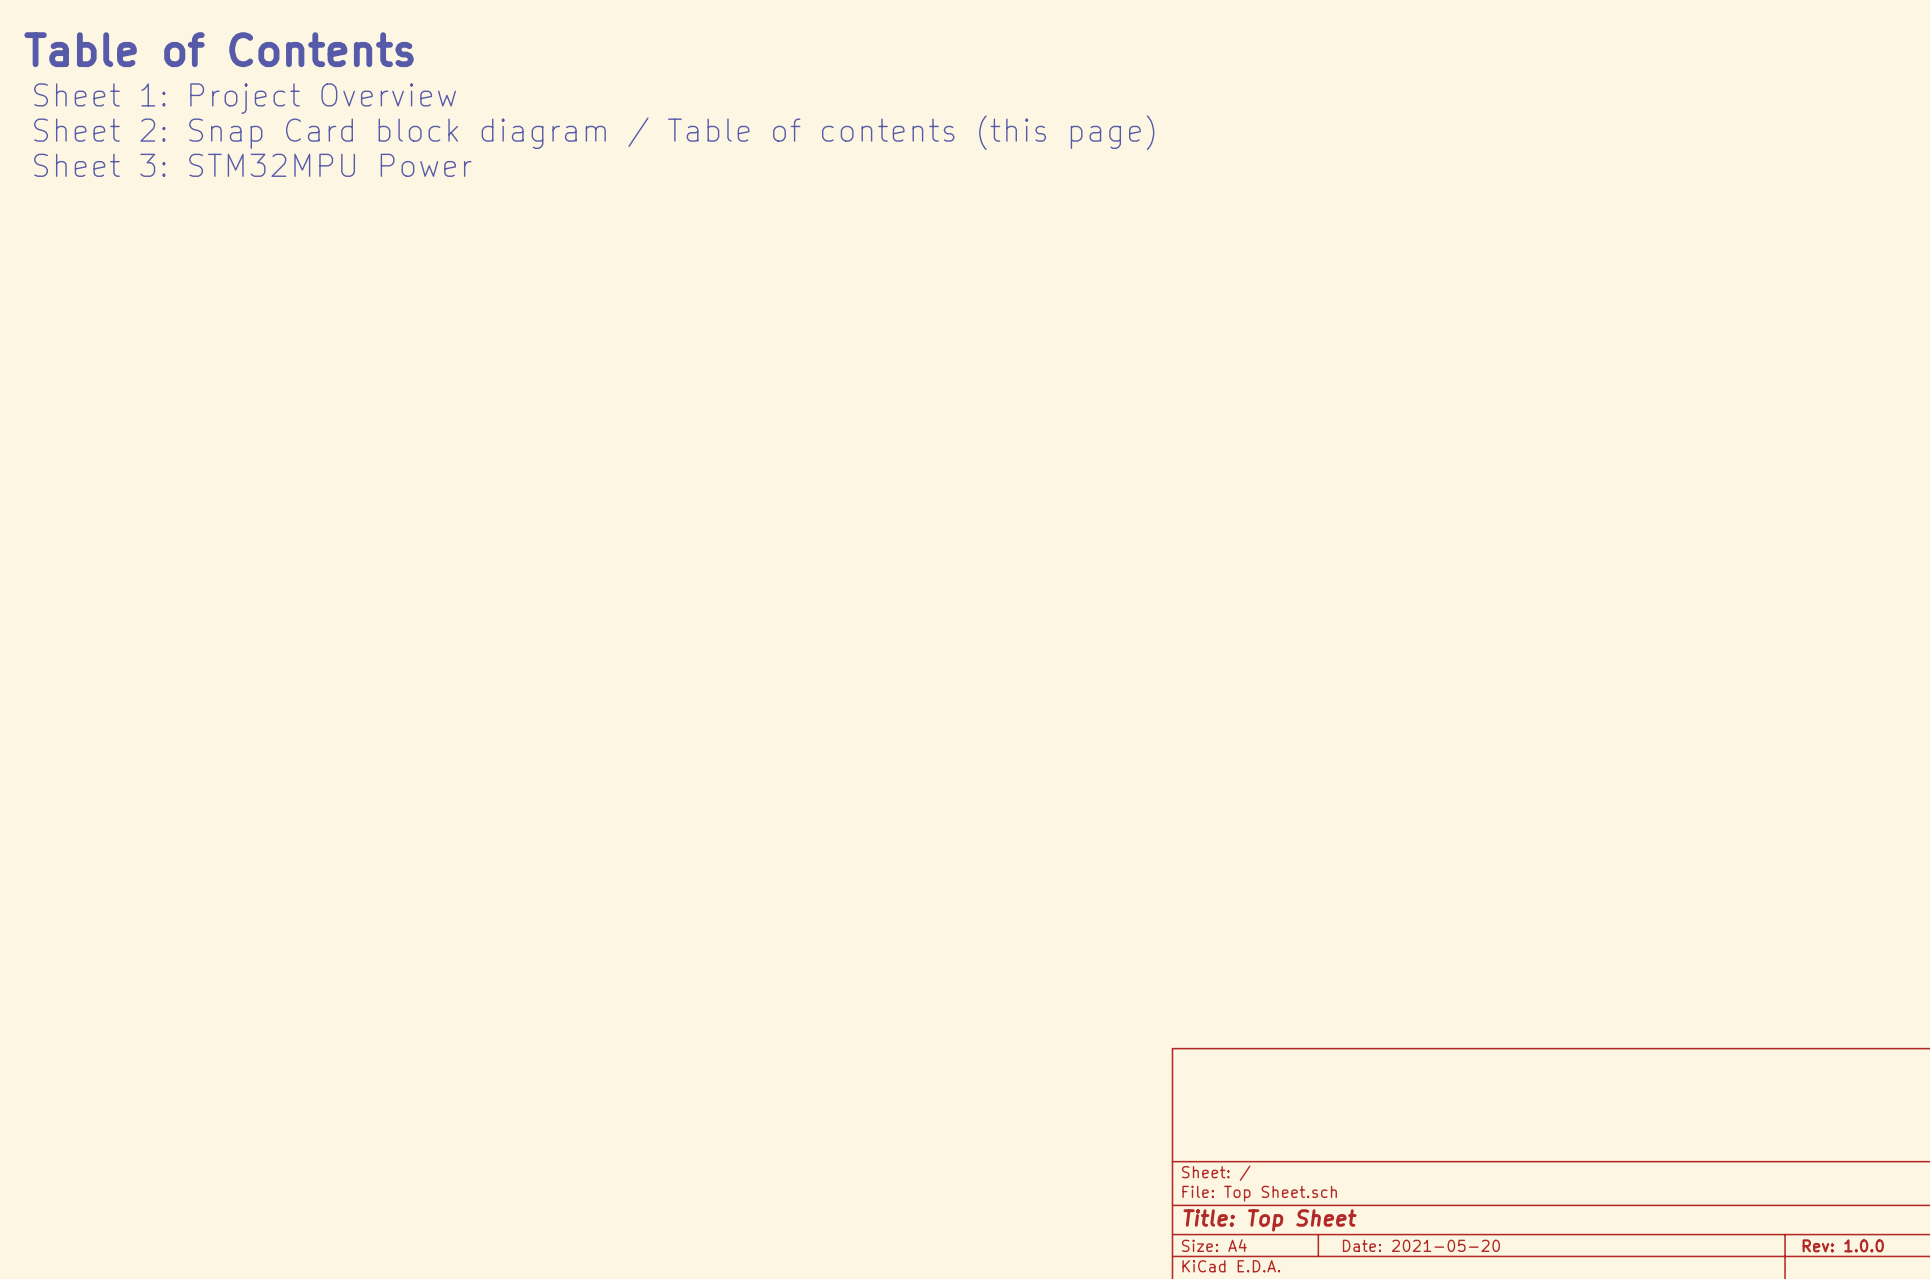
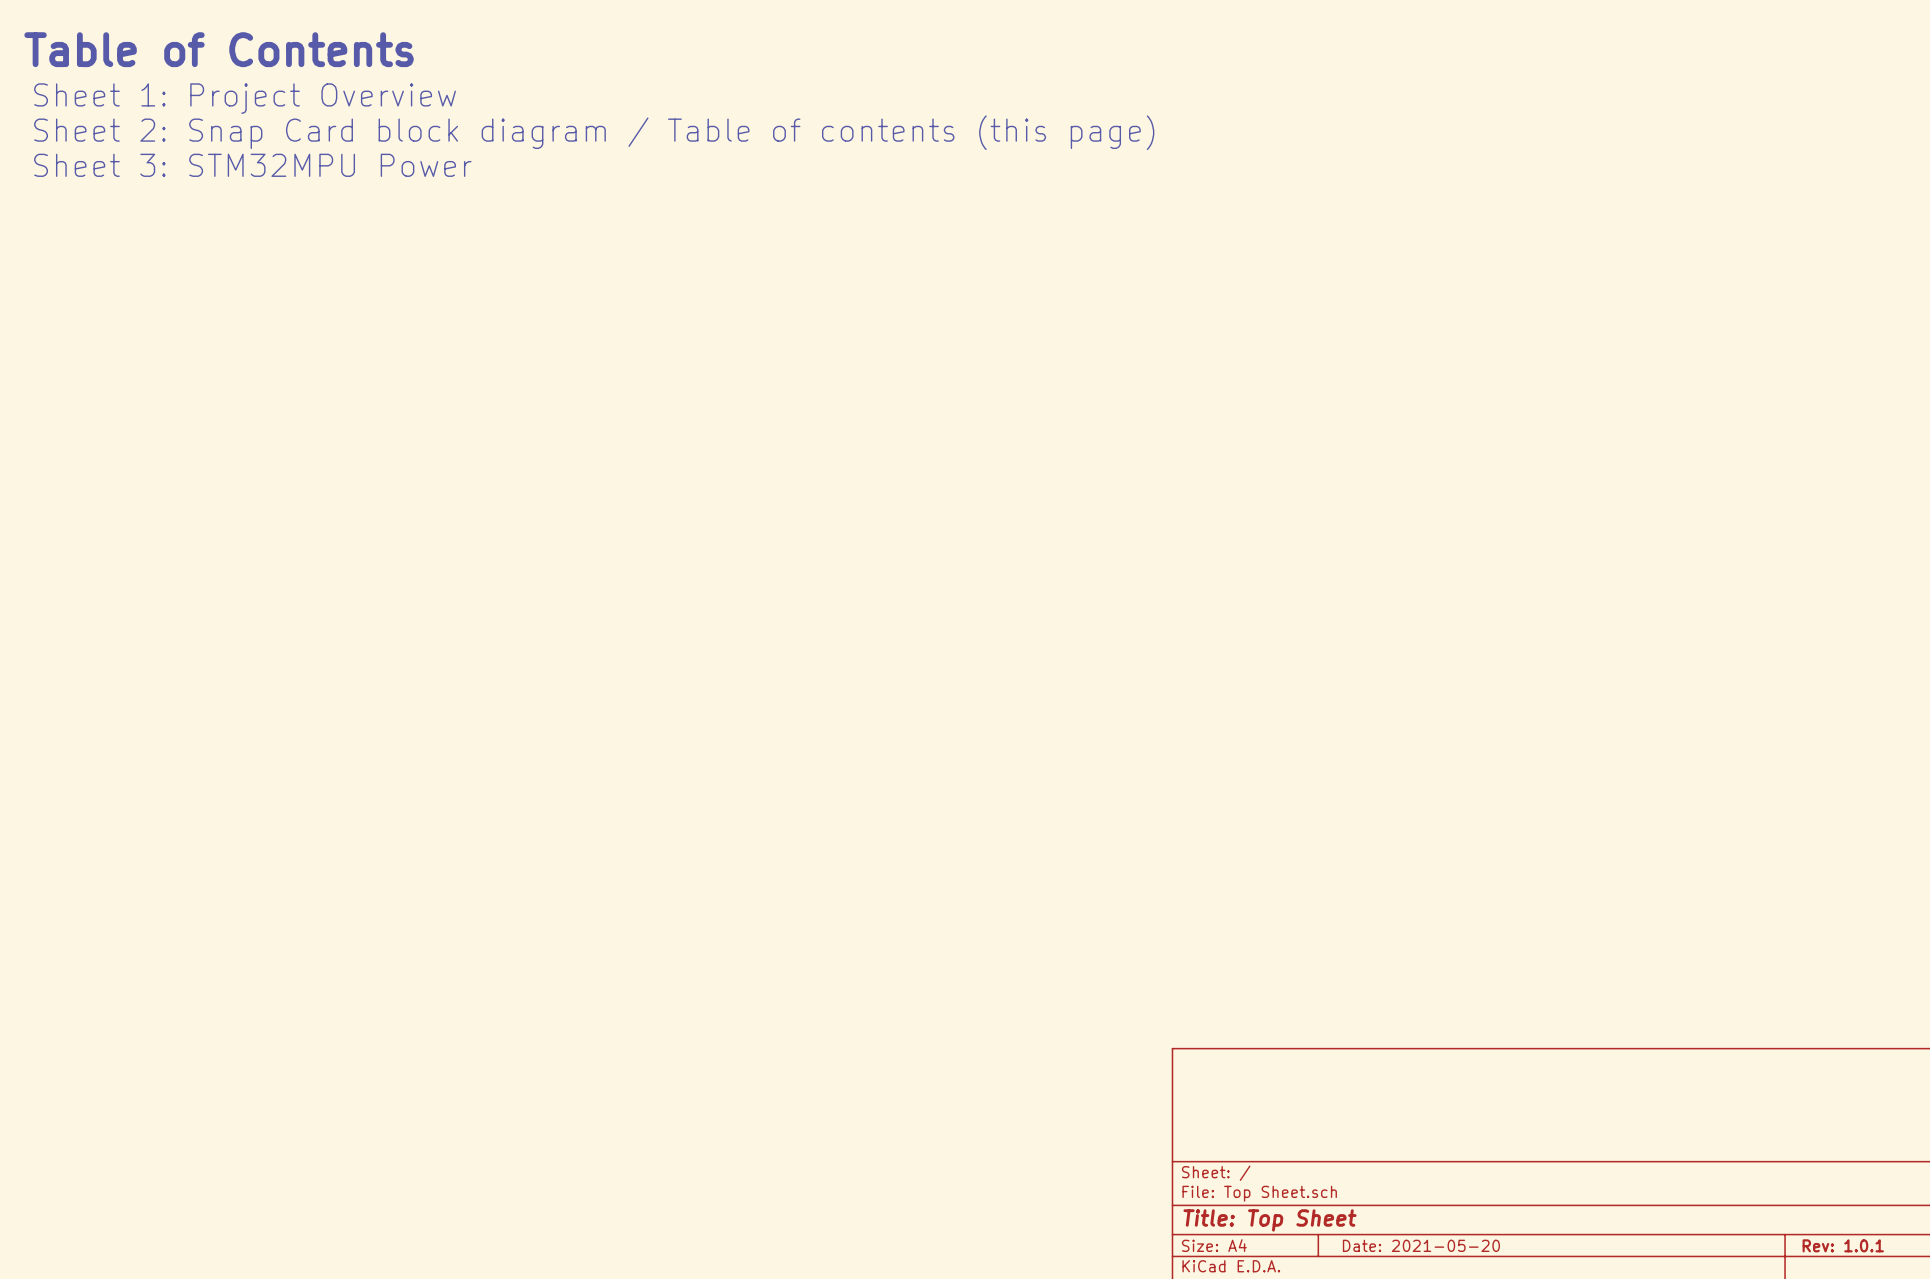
title block: Rev: 1.0.0 (1843, 1245) -> Rev: 1.0.1 (1843, 1245)

